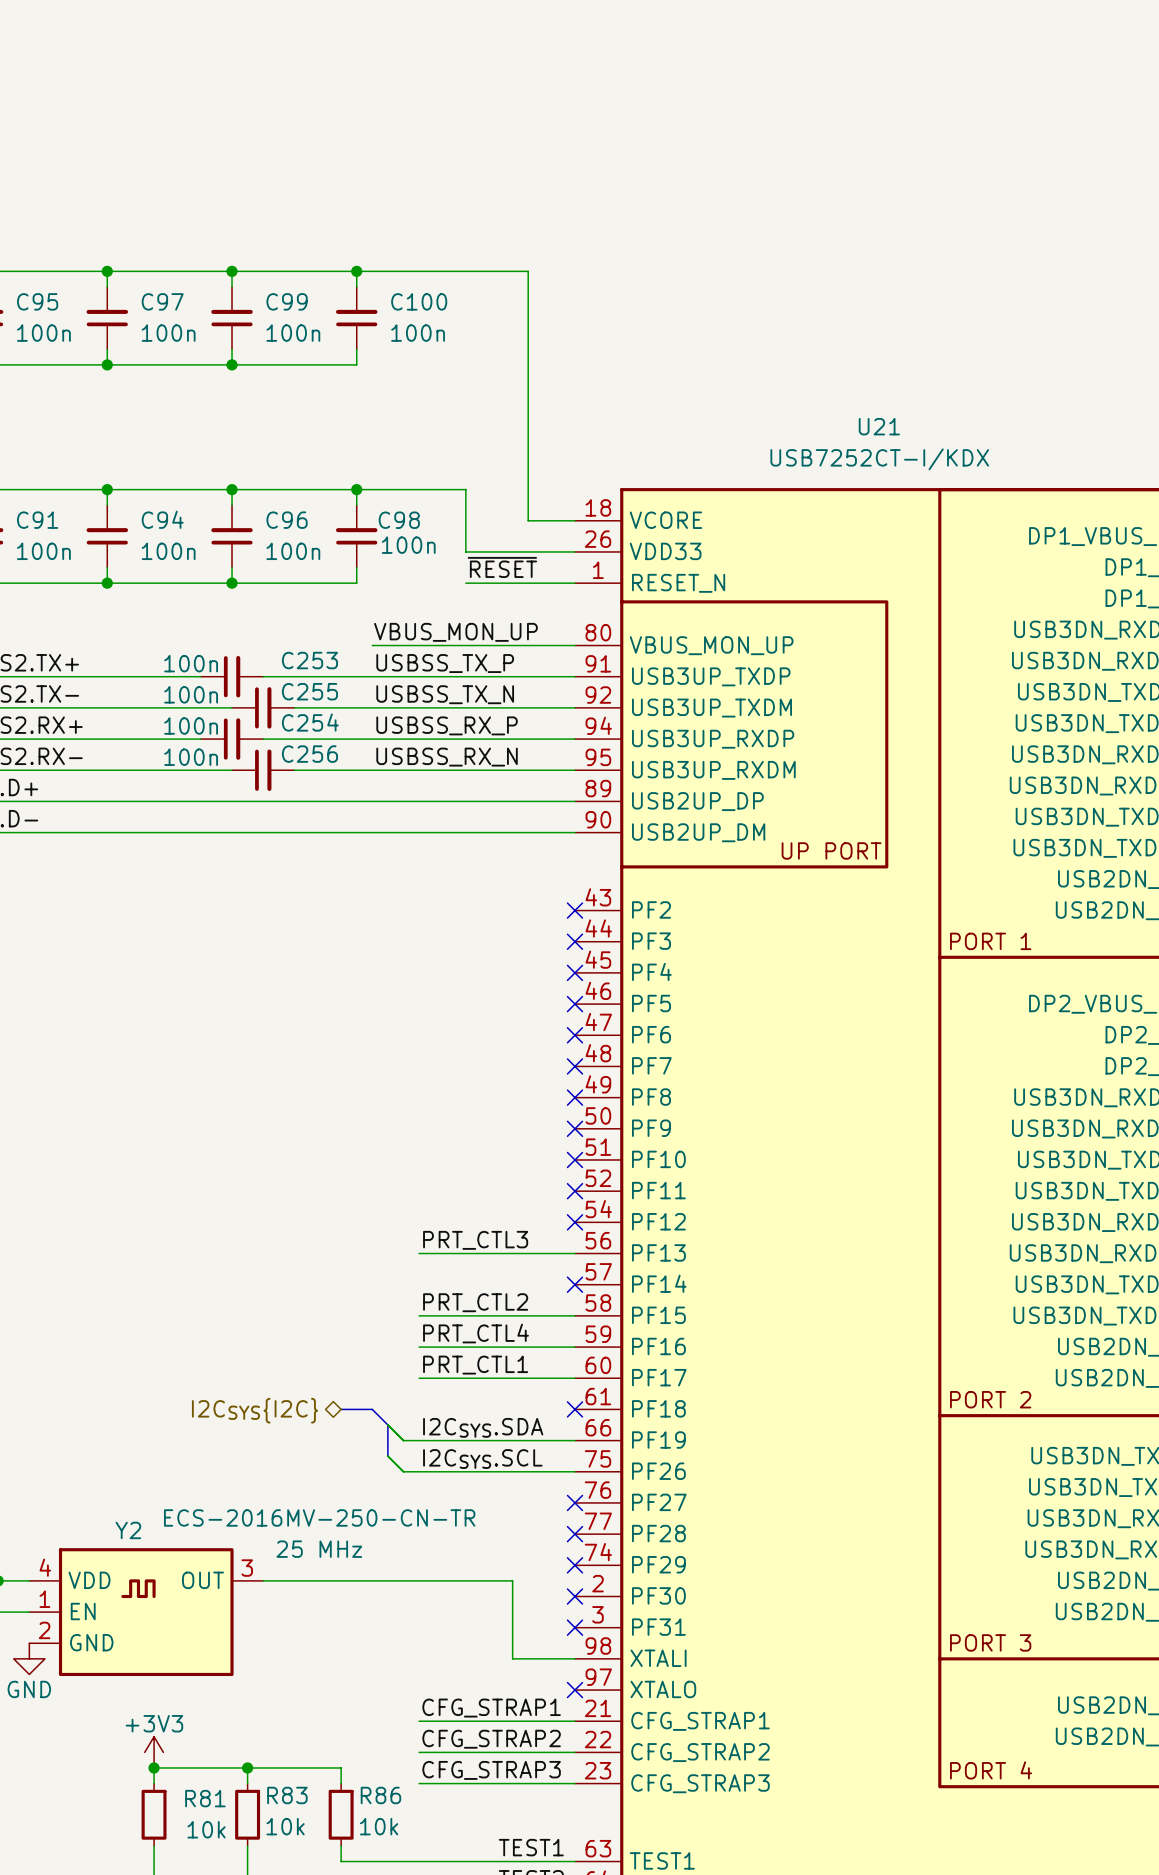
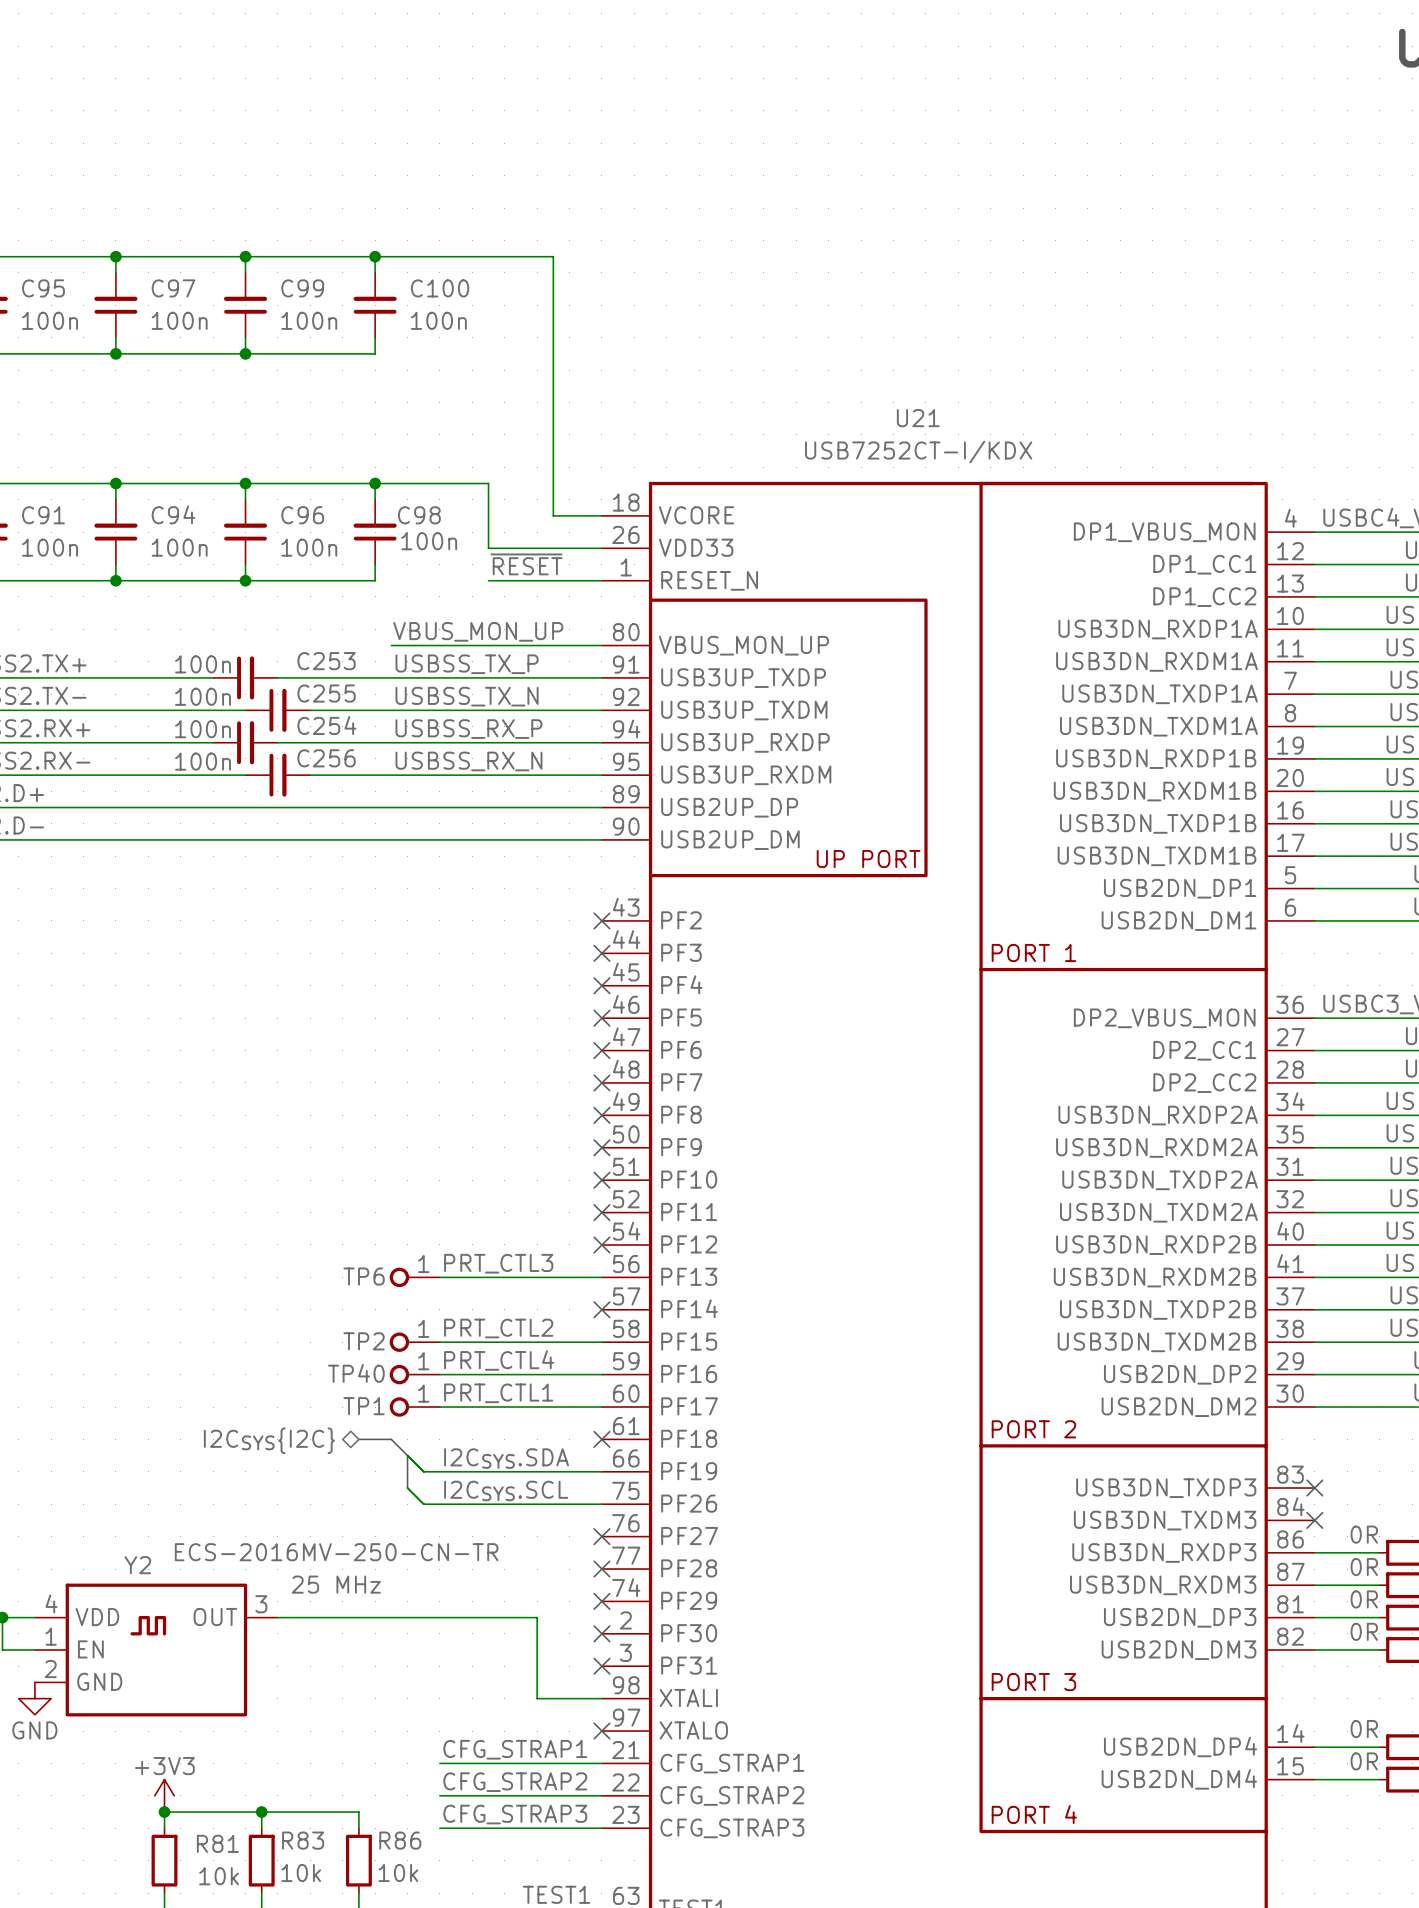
TP6: none -> (414, 1277)
TP2: none -> (414, 1342)
TP40: none -> (414, 1374)
TP1: none -> (414, 1407)

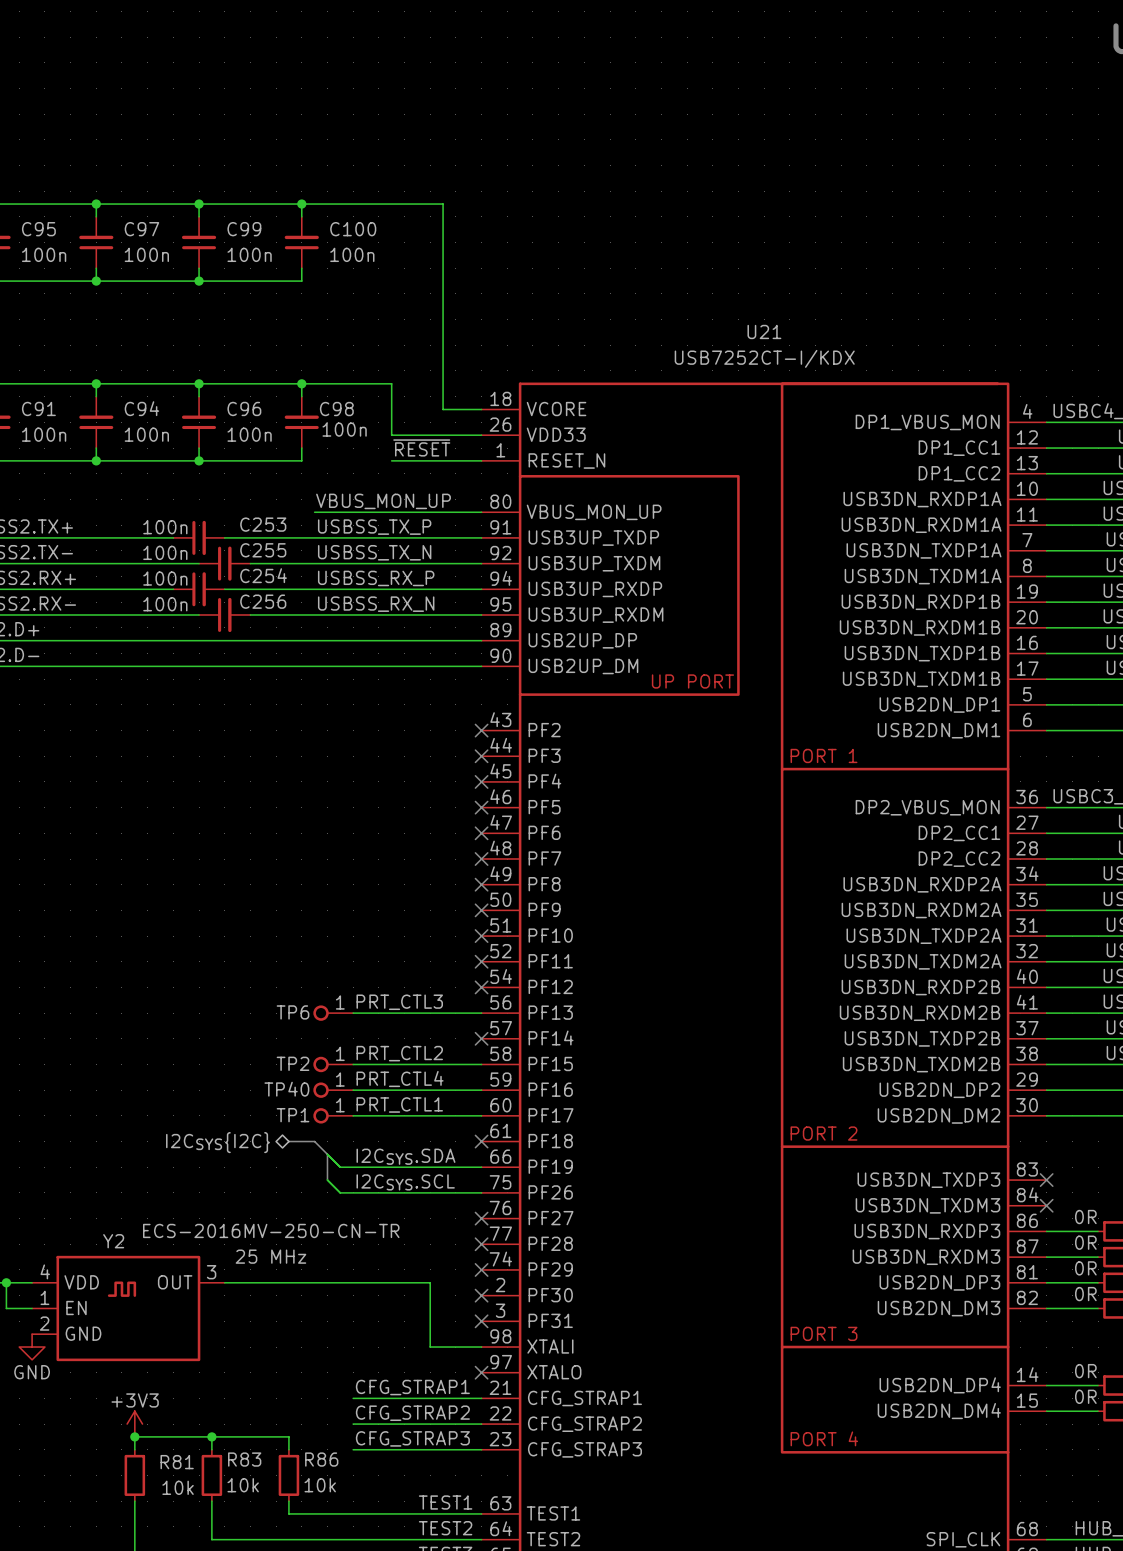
U21 name position: U21 (918, 418) -> U21 (764, 331)
U21 text position: USB7252CT-I/KDX (918, 452) -> USB7252CT-I/KDX (764, 358)

